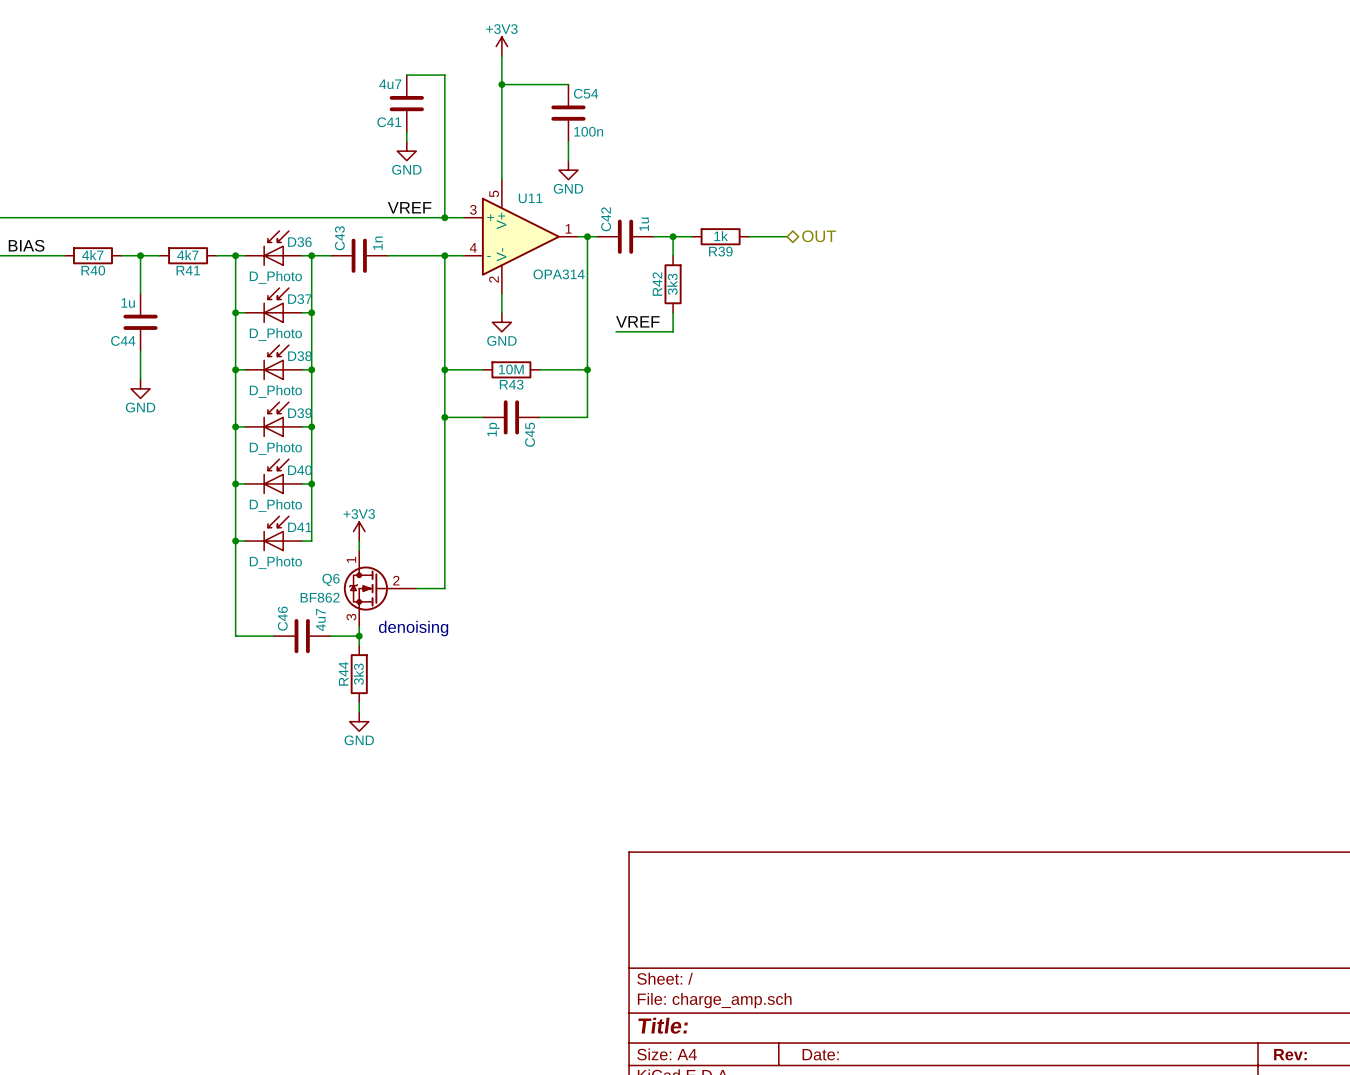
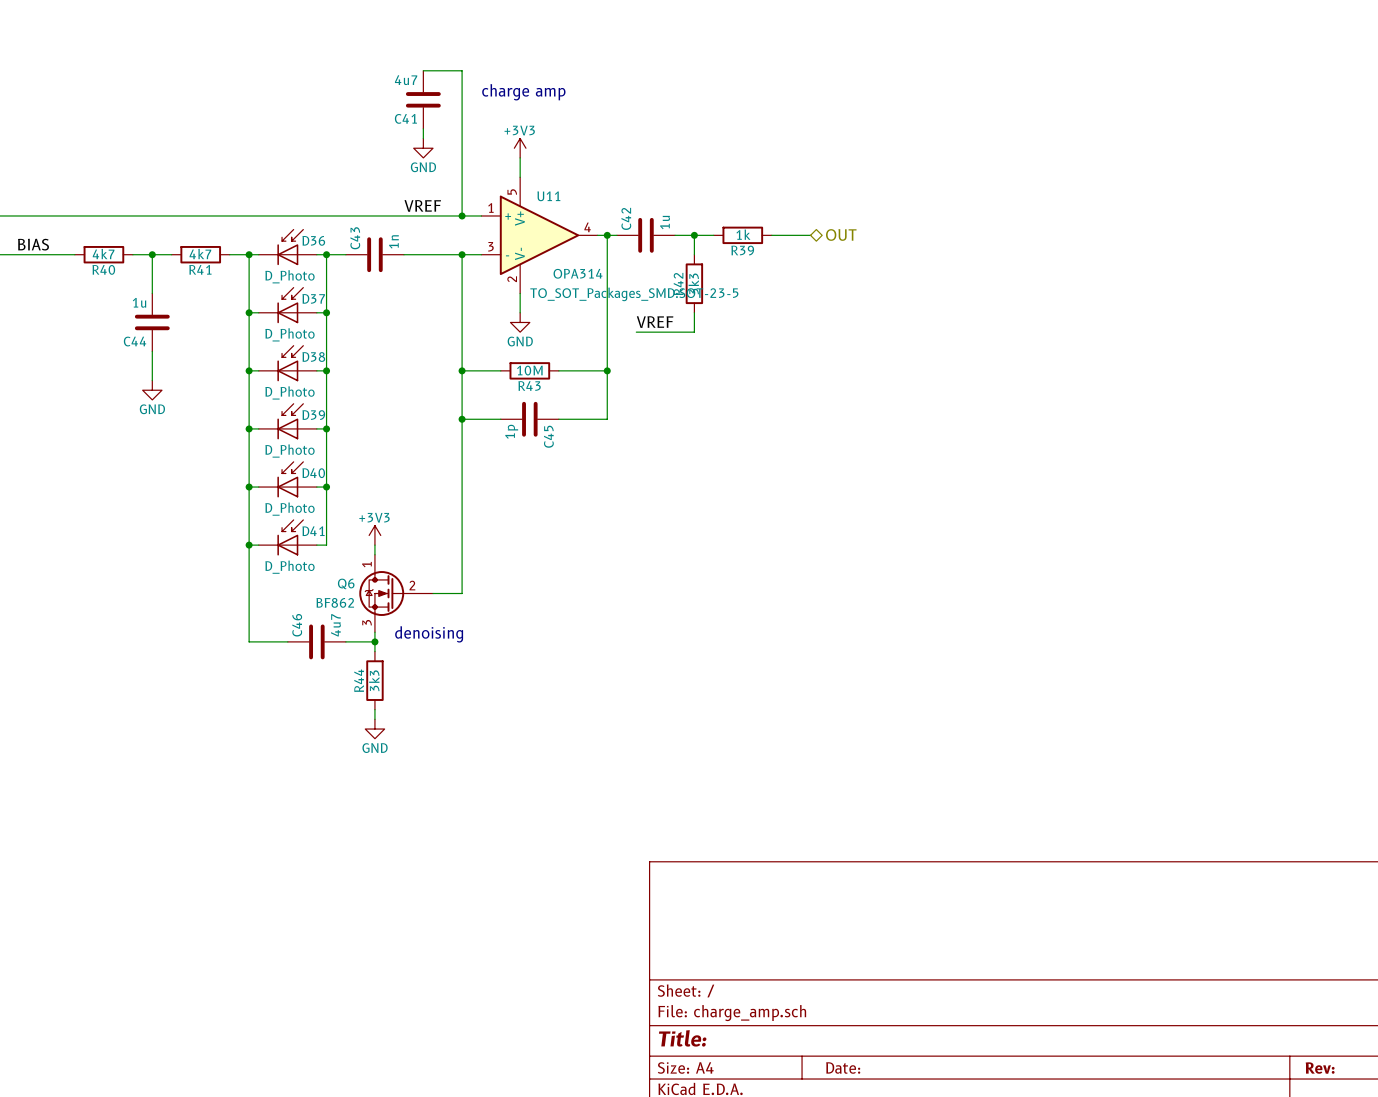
power symbol position: +3V3 (501, 46) -> +3V3 (520, 148)
wire: (501, 56) (501, 160) -> none
wire: (501, 84) (568, 84) -> none
junction: (501, 84) -> none
text: none -> charge amp (523, 92)
C54: 100n (568, 113) -> none
wire: (568, 141) (568, 160) -> none
power symbol: GND (568, 170) -> none
U11 pin number: 3 (473, 209) -> 1 (490, 208)
U11 pin number: 1 (568, 228) -> 4 (587, 227)
U11 pin number: 4 (473, 247) -> 3 (490, 246)
U11 text: none -> TO_SOT_Packages_SMD:SOT-23-5 (634, 294)

